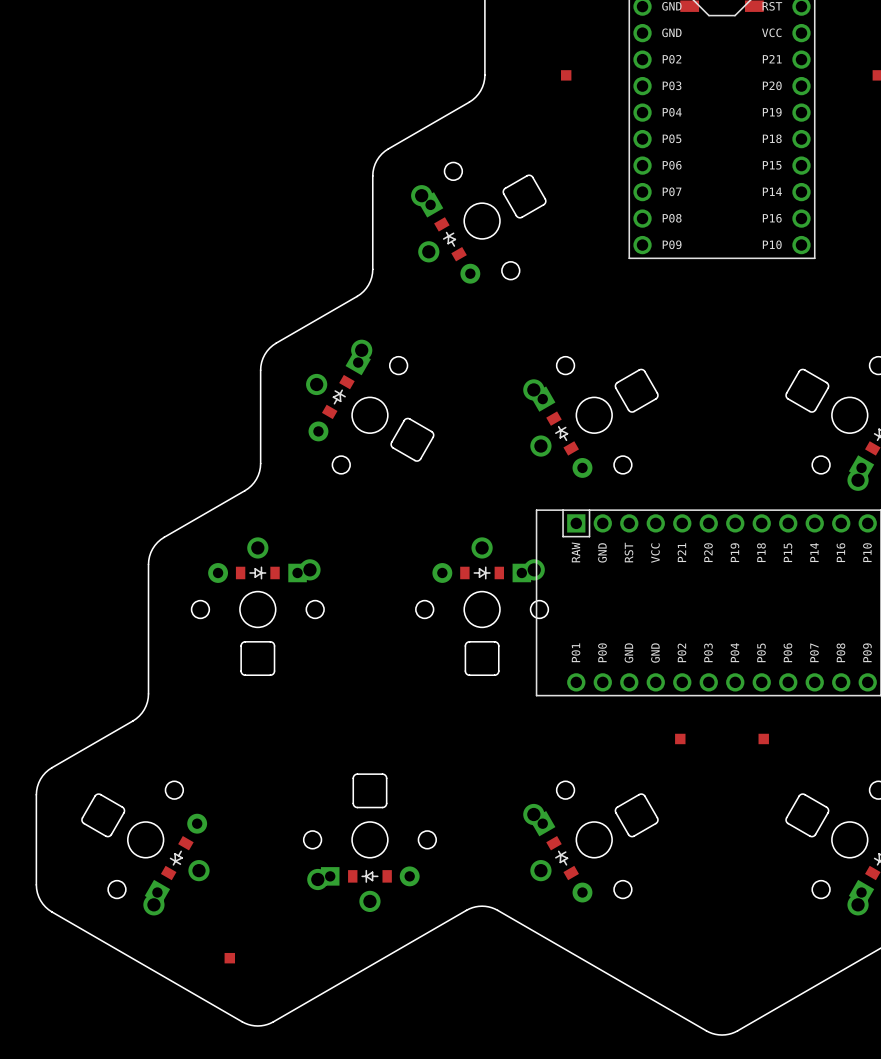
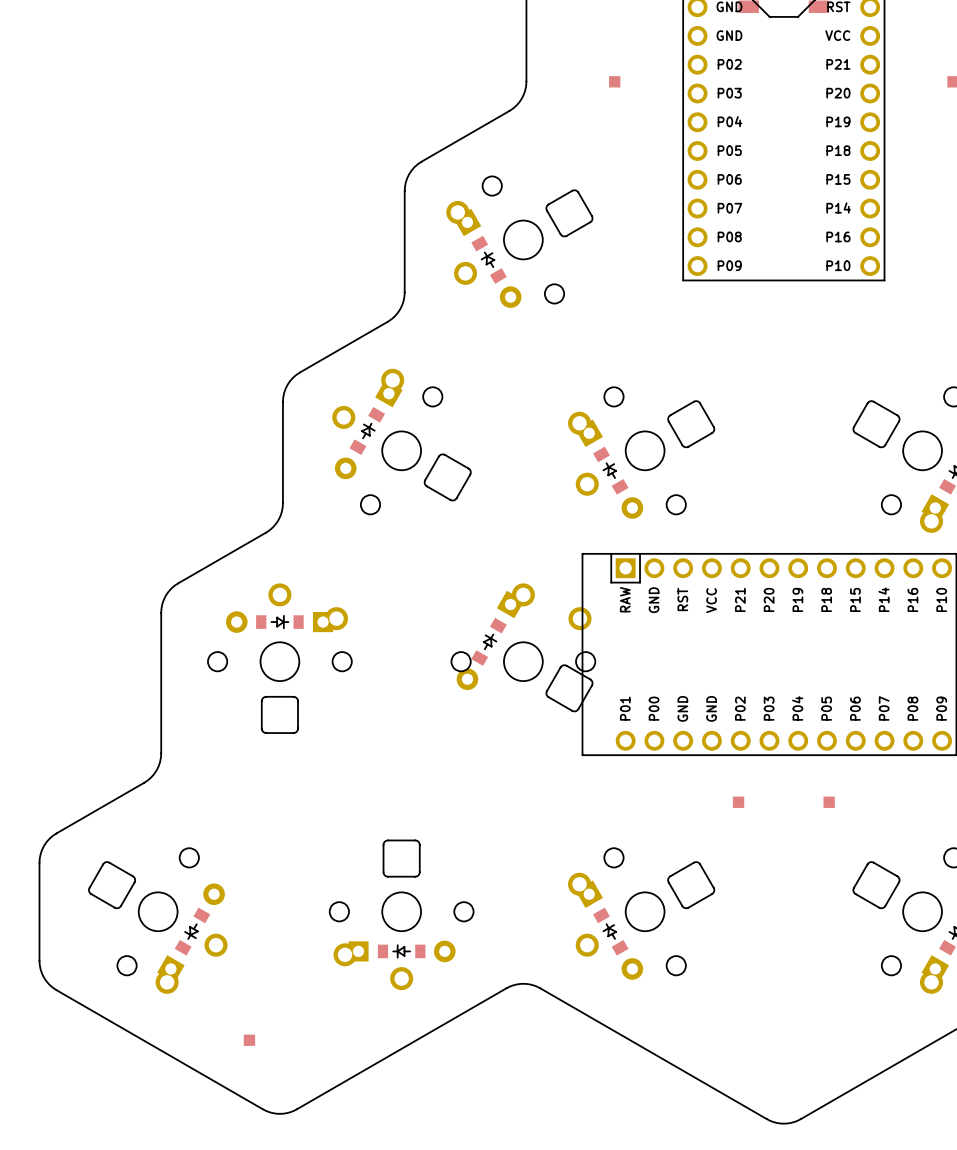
part: (481, 572) -> none
part: none -> (490, 640)
board edge: none -> (566, 665) (590, 679) (592, 682) (578, 709) (575, 711) (548, 697) (546, 693) (560, 666) (566, 665)
board edge: (469, 641) (497, 643) (498, 671) (497, 674) (469, 675) (466, 673) (465, 645) (469, 641) -> none

